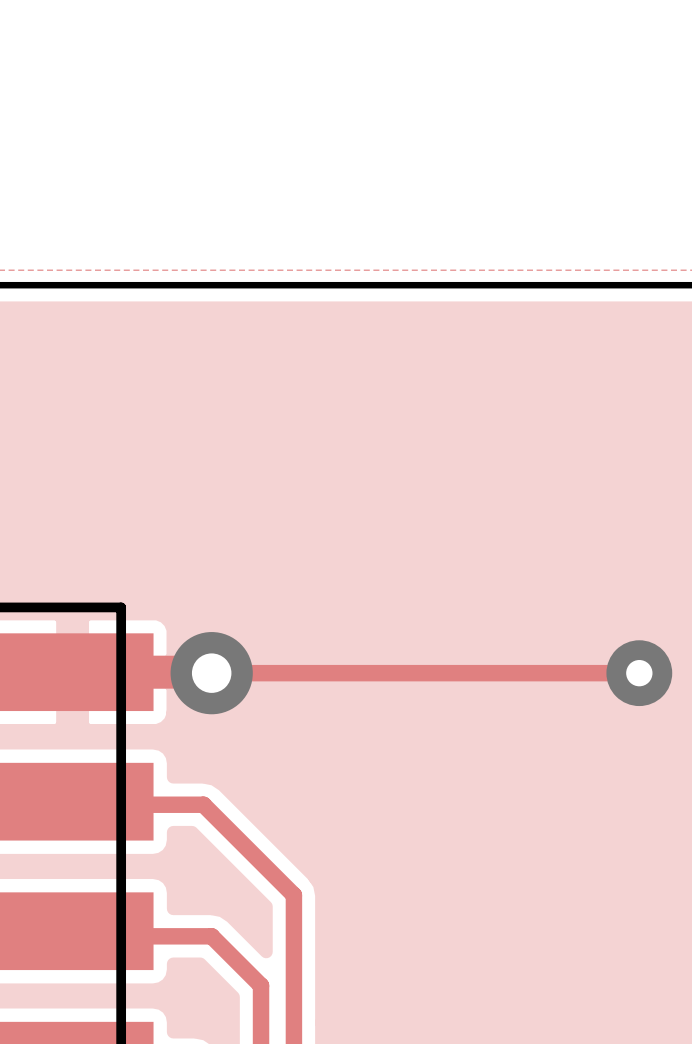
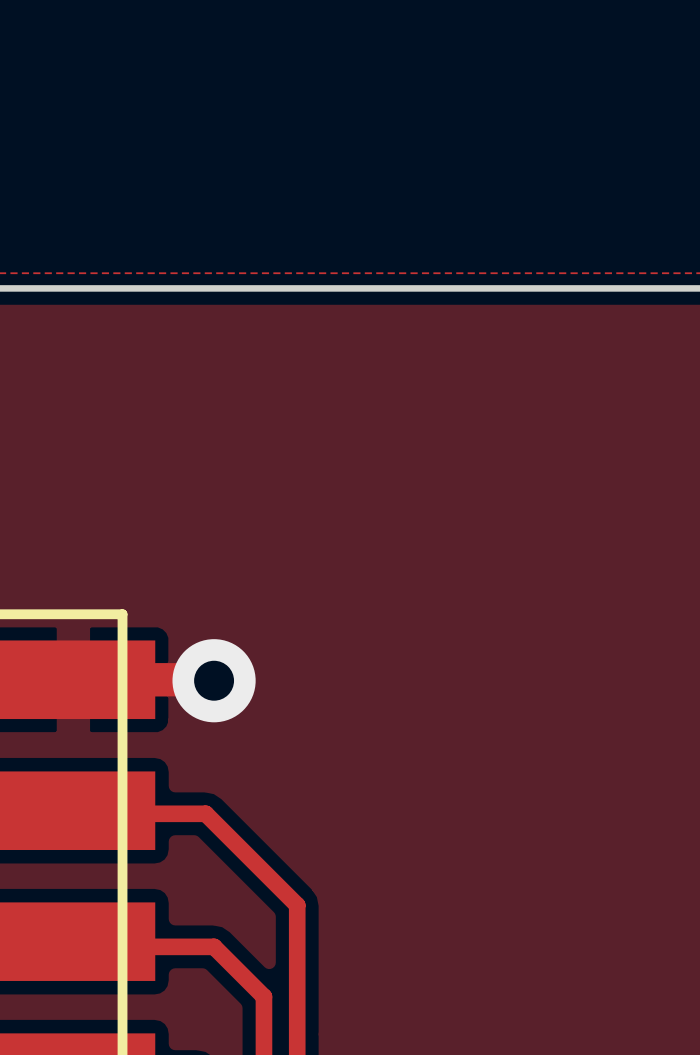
track: (211, 673) (639, 673) -> none
via: (639, 673) -> none

